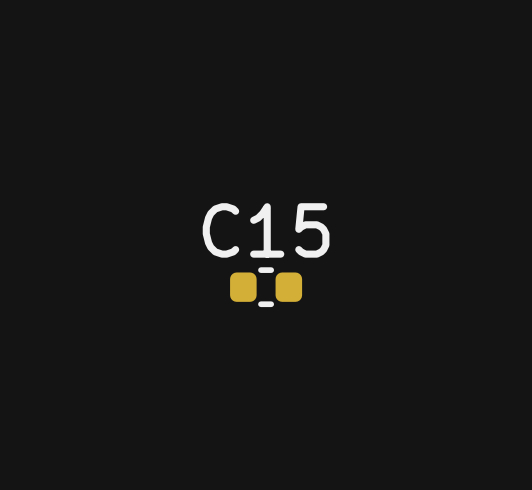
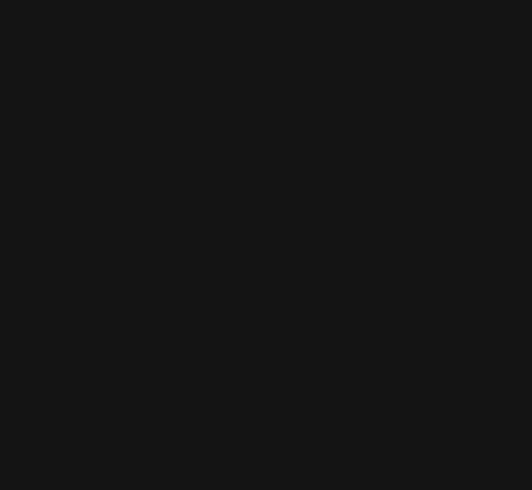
C15: (266, 287) -> none

